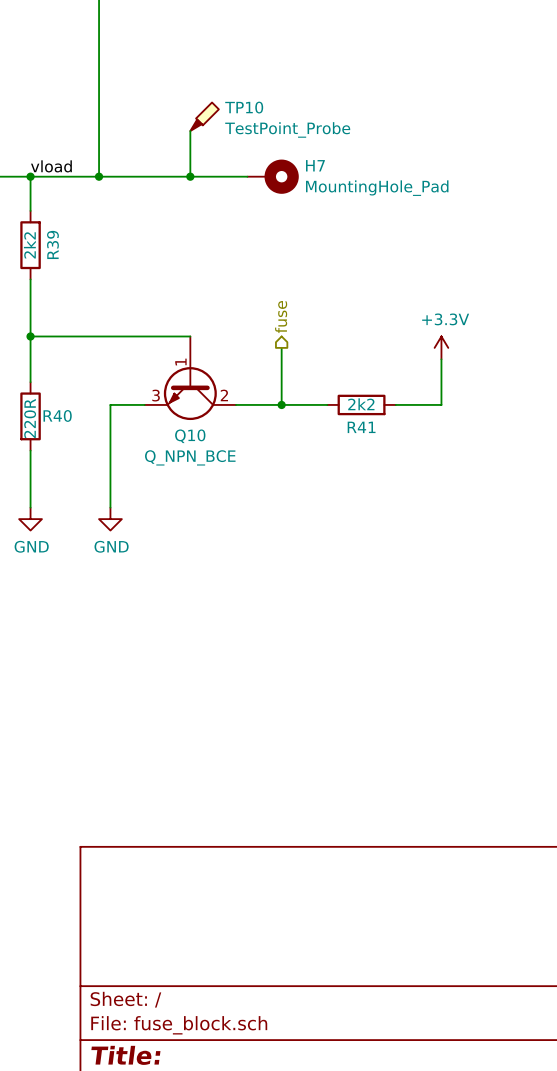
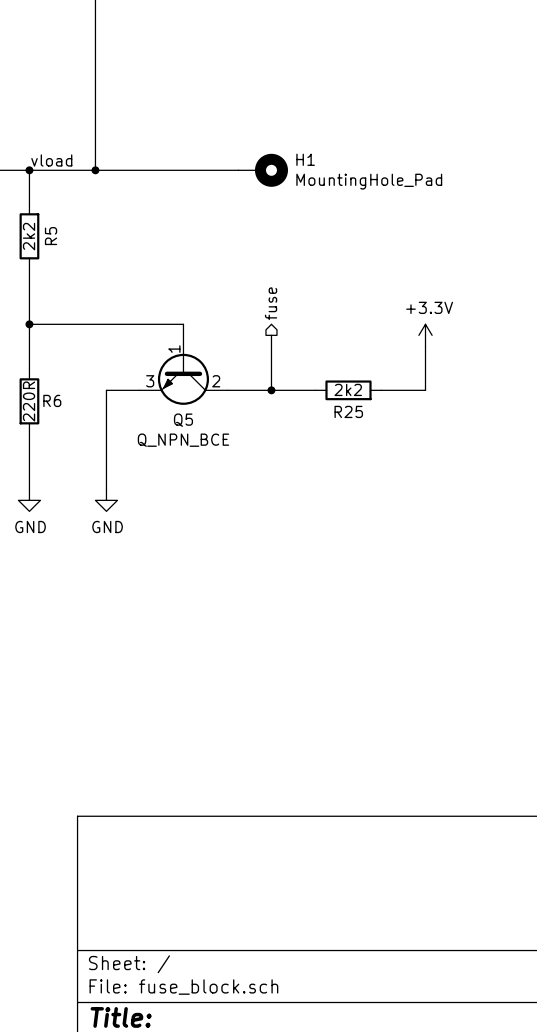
TP10: TestPoint_Probe (204, 116) -> none
wire: (190, 131) (190, 176) -> none
H7 name: H7 (315, 165) -> H1 (305, 159)
junction: (190, 176) -> none
R39 name: R39 (52, 244) -> R5 (51, 236)
R40 name: R40 (57, 415) -> R6 (52, 400)
R41 name: R41 (361, 427) -> R25 (348, 411)
Q10 name: Q10 (190, 436) -> Q5 (183, 420)

